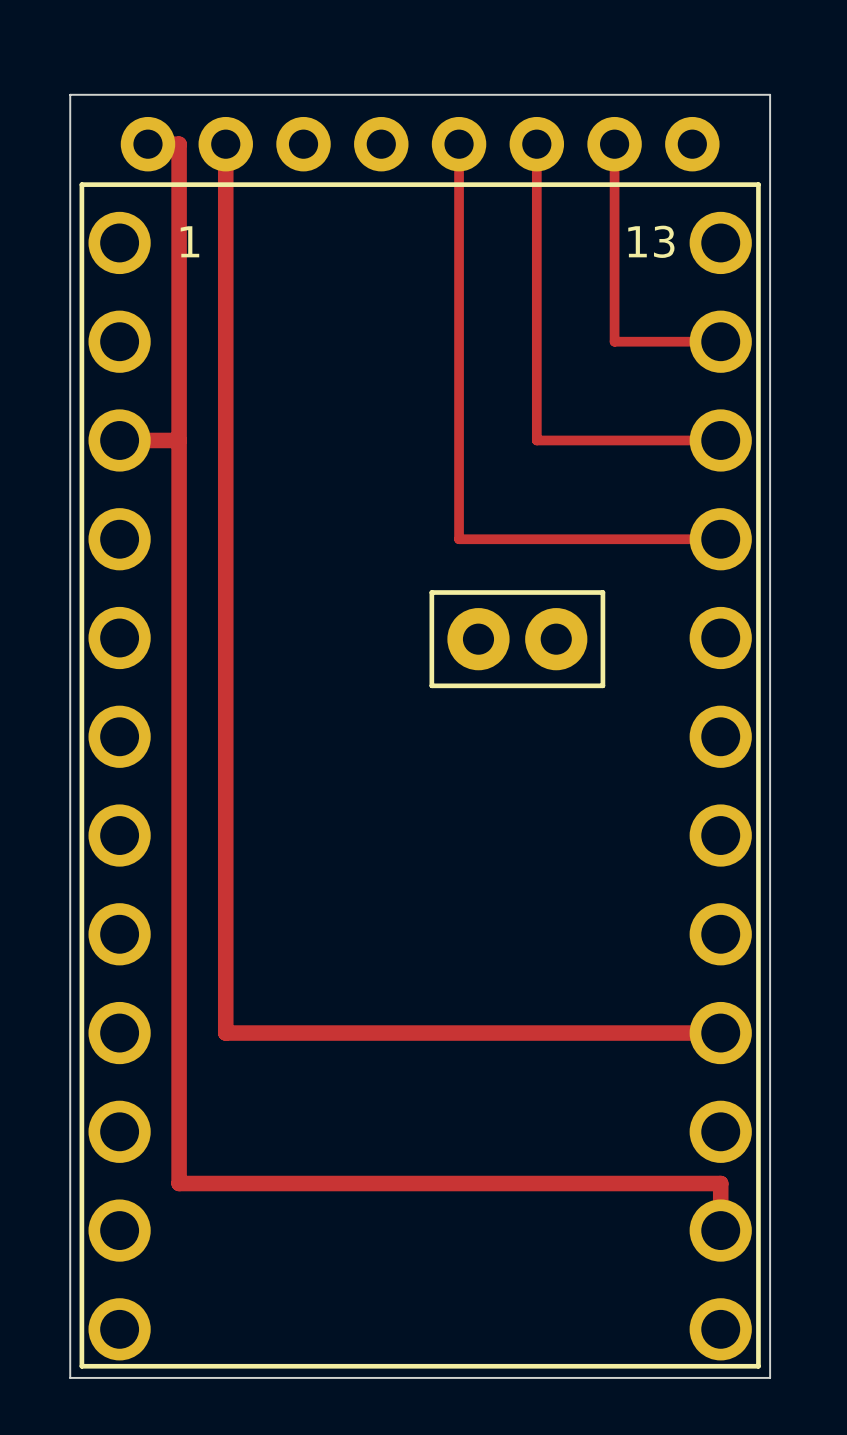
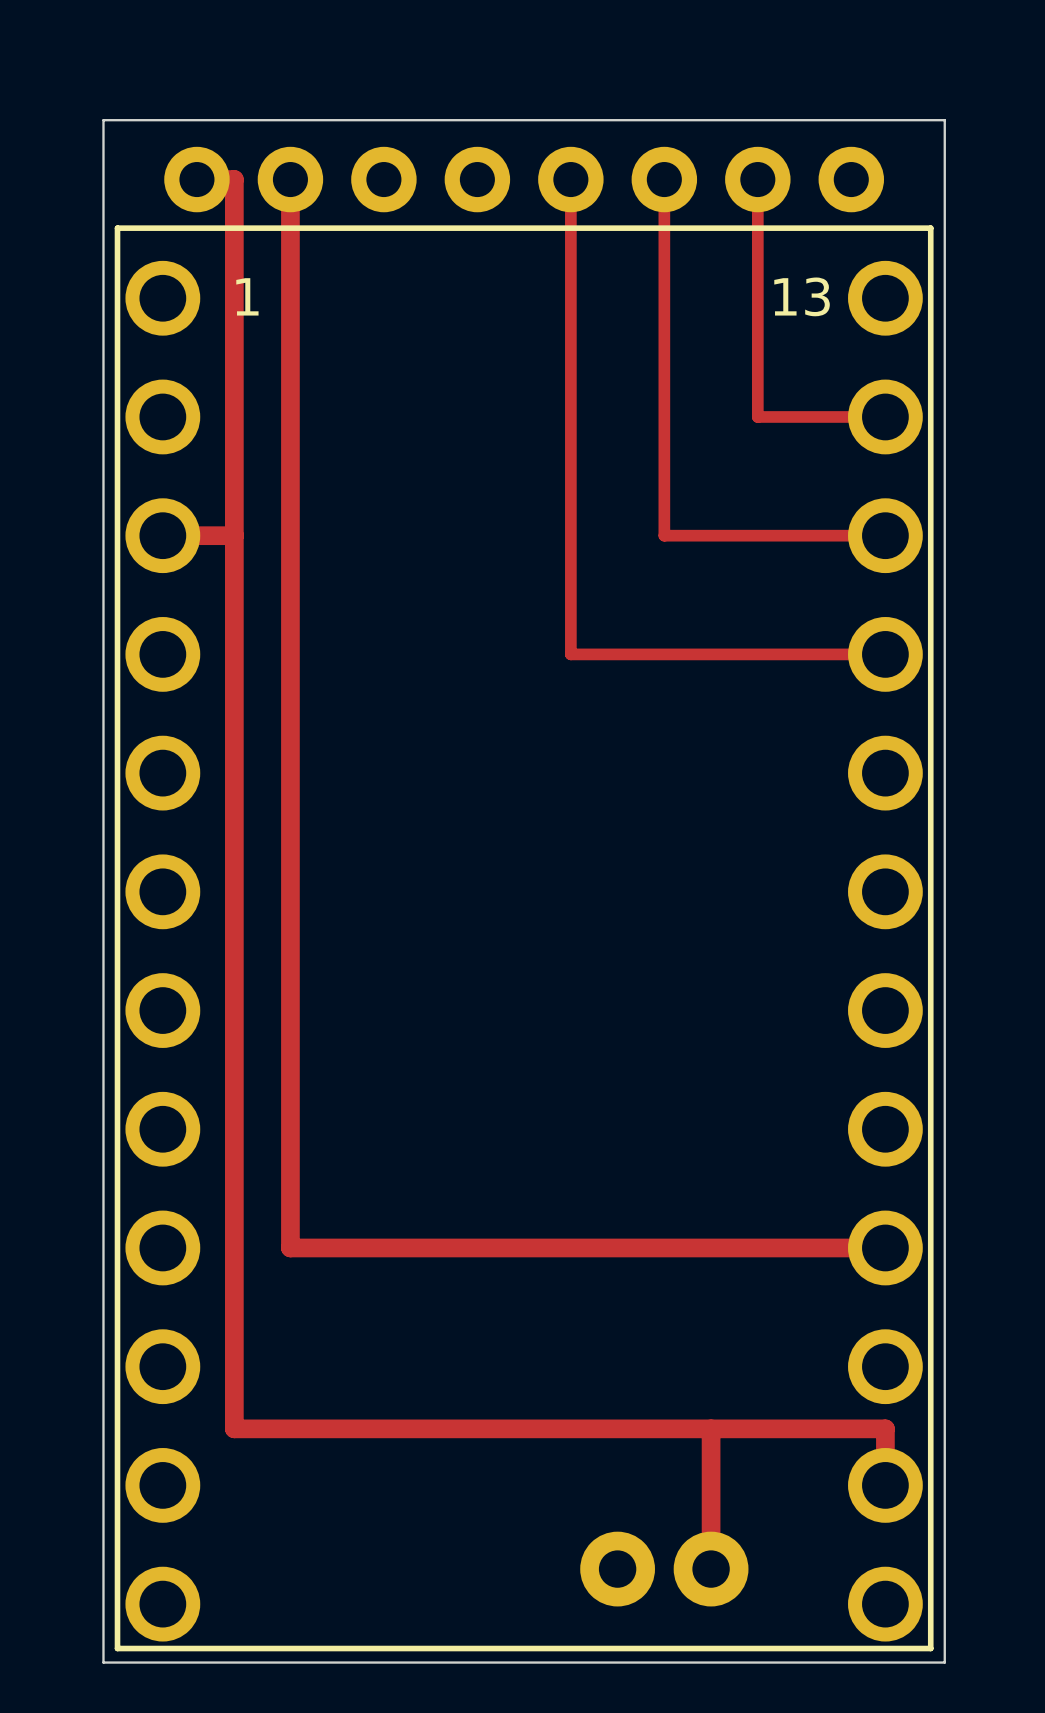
part: (517, 639) -> none
track: none -> (711, 1428) (711, 1569)
part: none -> (664, 1569)

